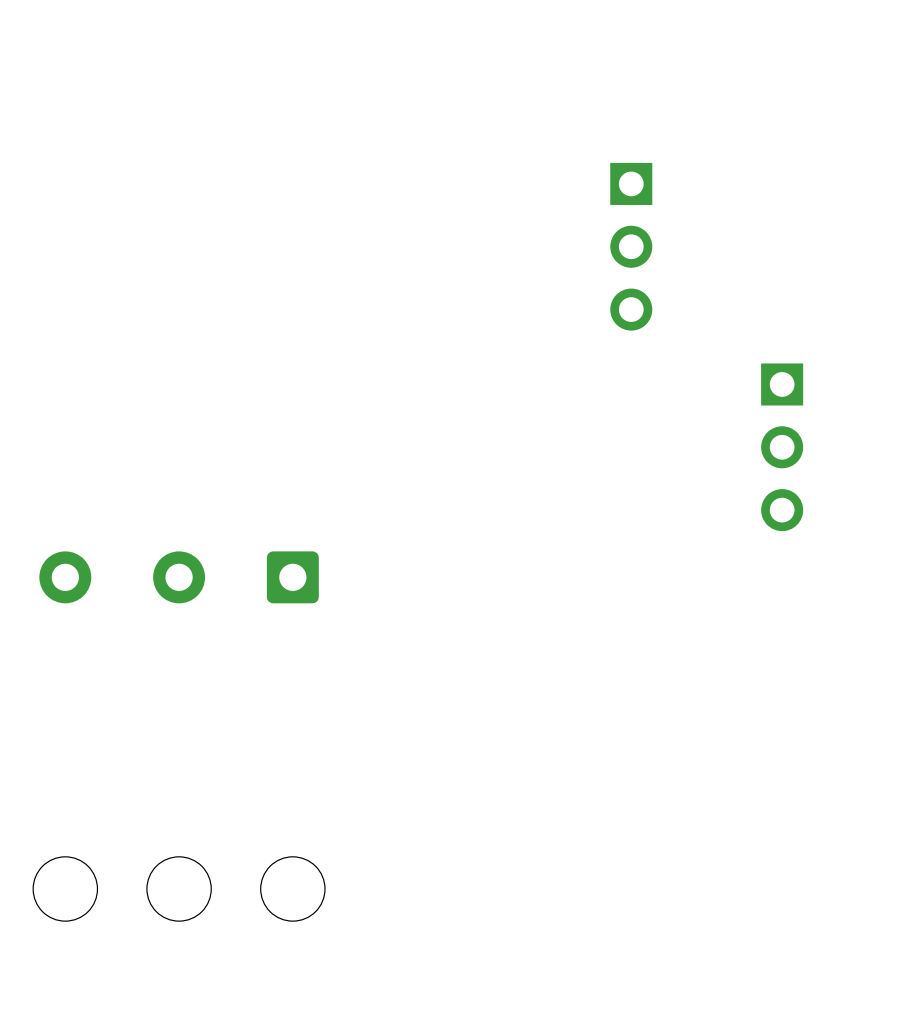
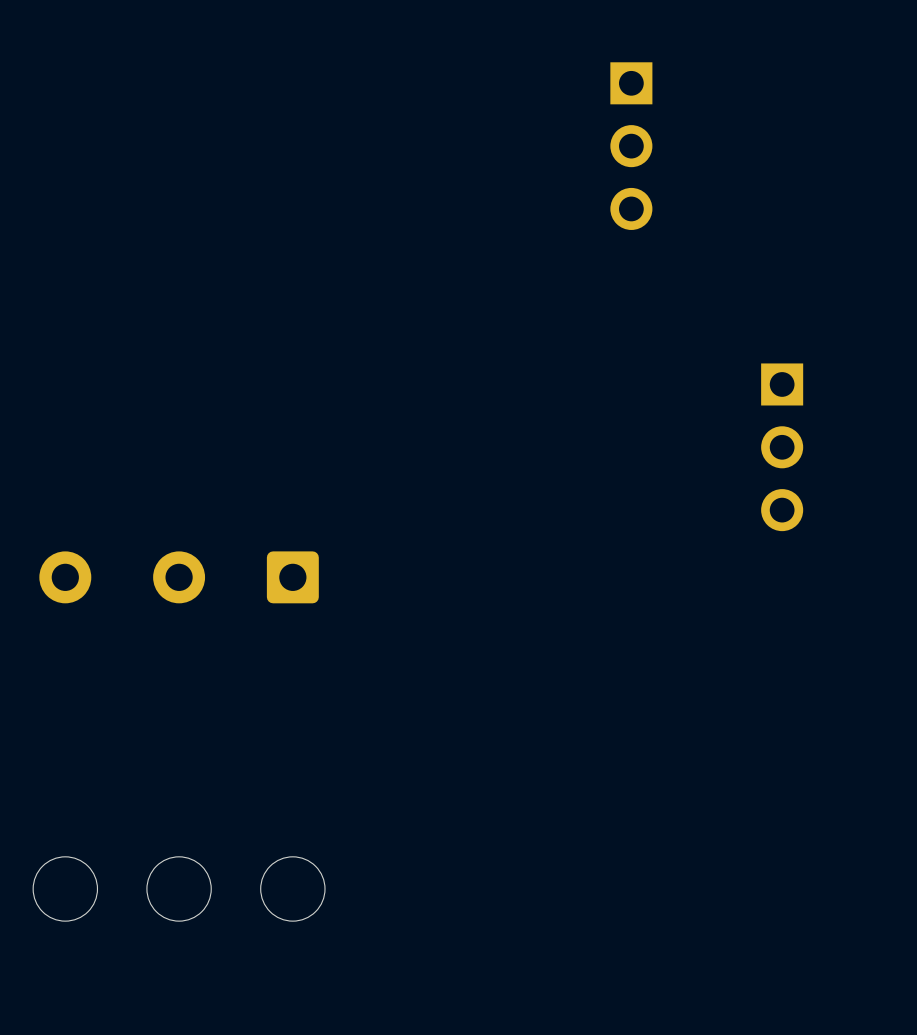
part position: (631, 246) -> (631, 146)

